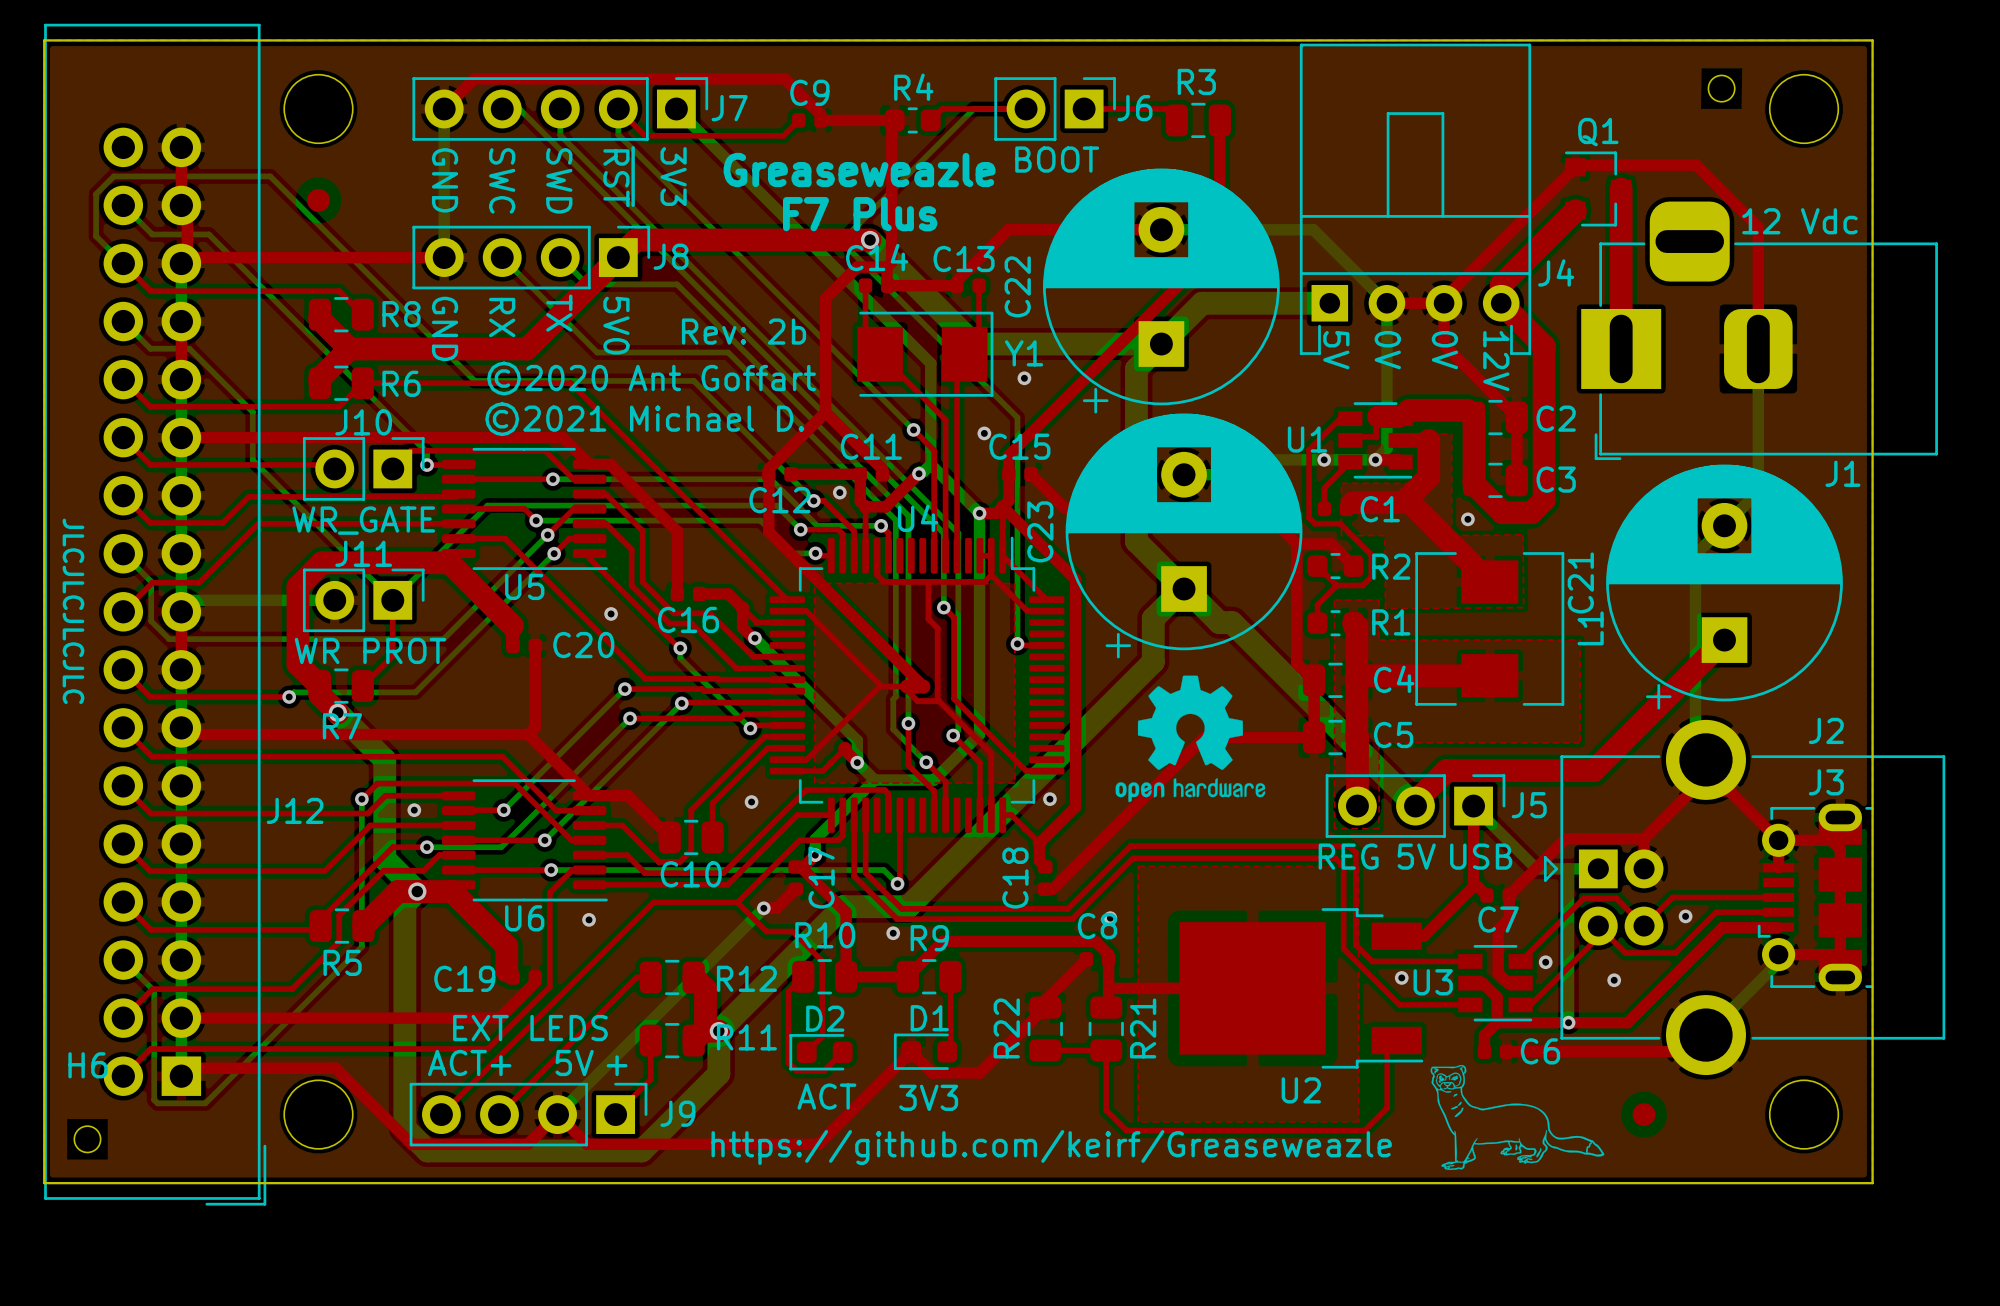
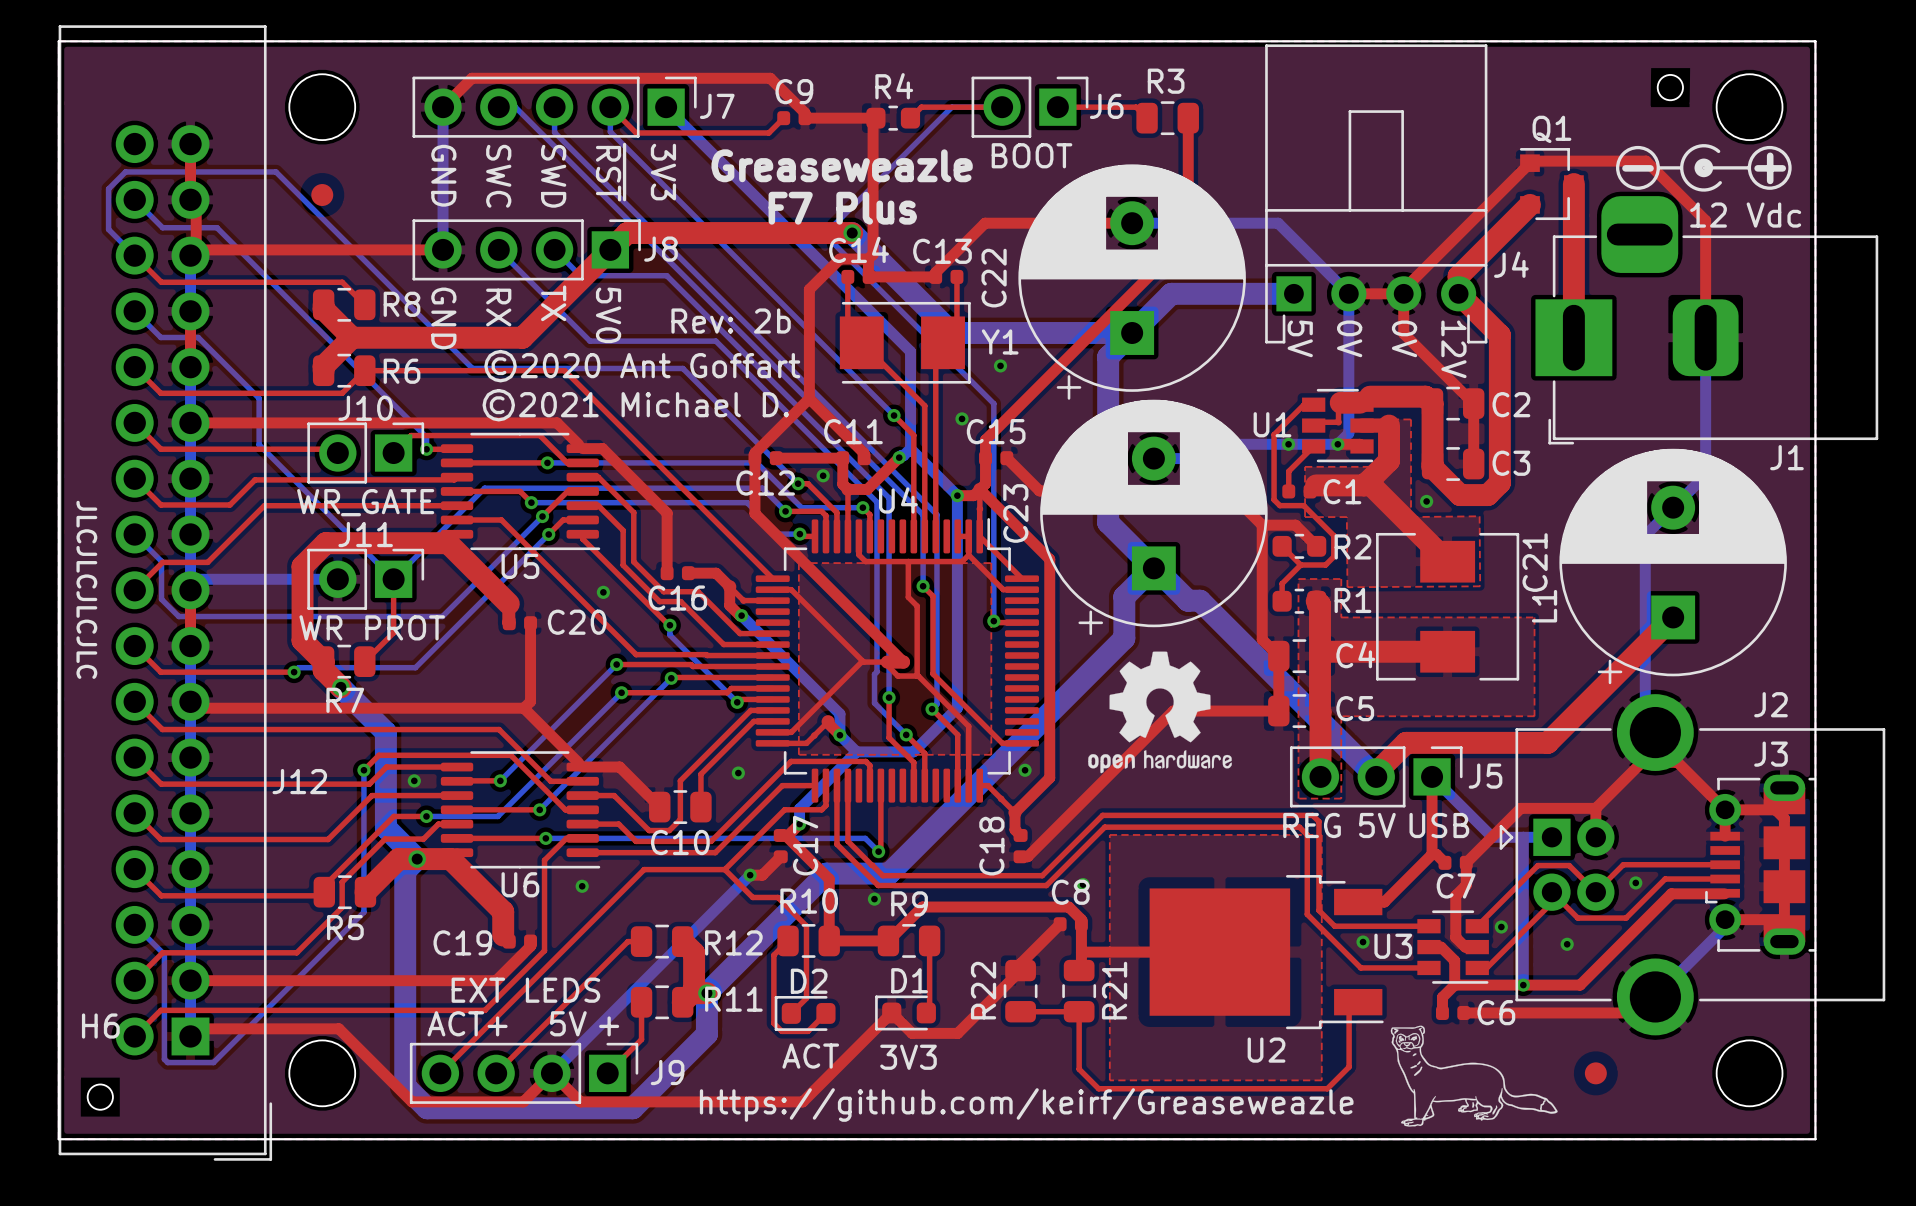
drawing: none -> [1615, 144, 1792, 192]
text: none -> - (1638, 168)
text: none -> + (1770, 168)

